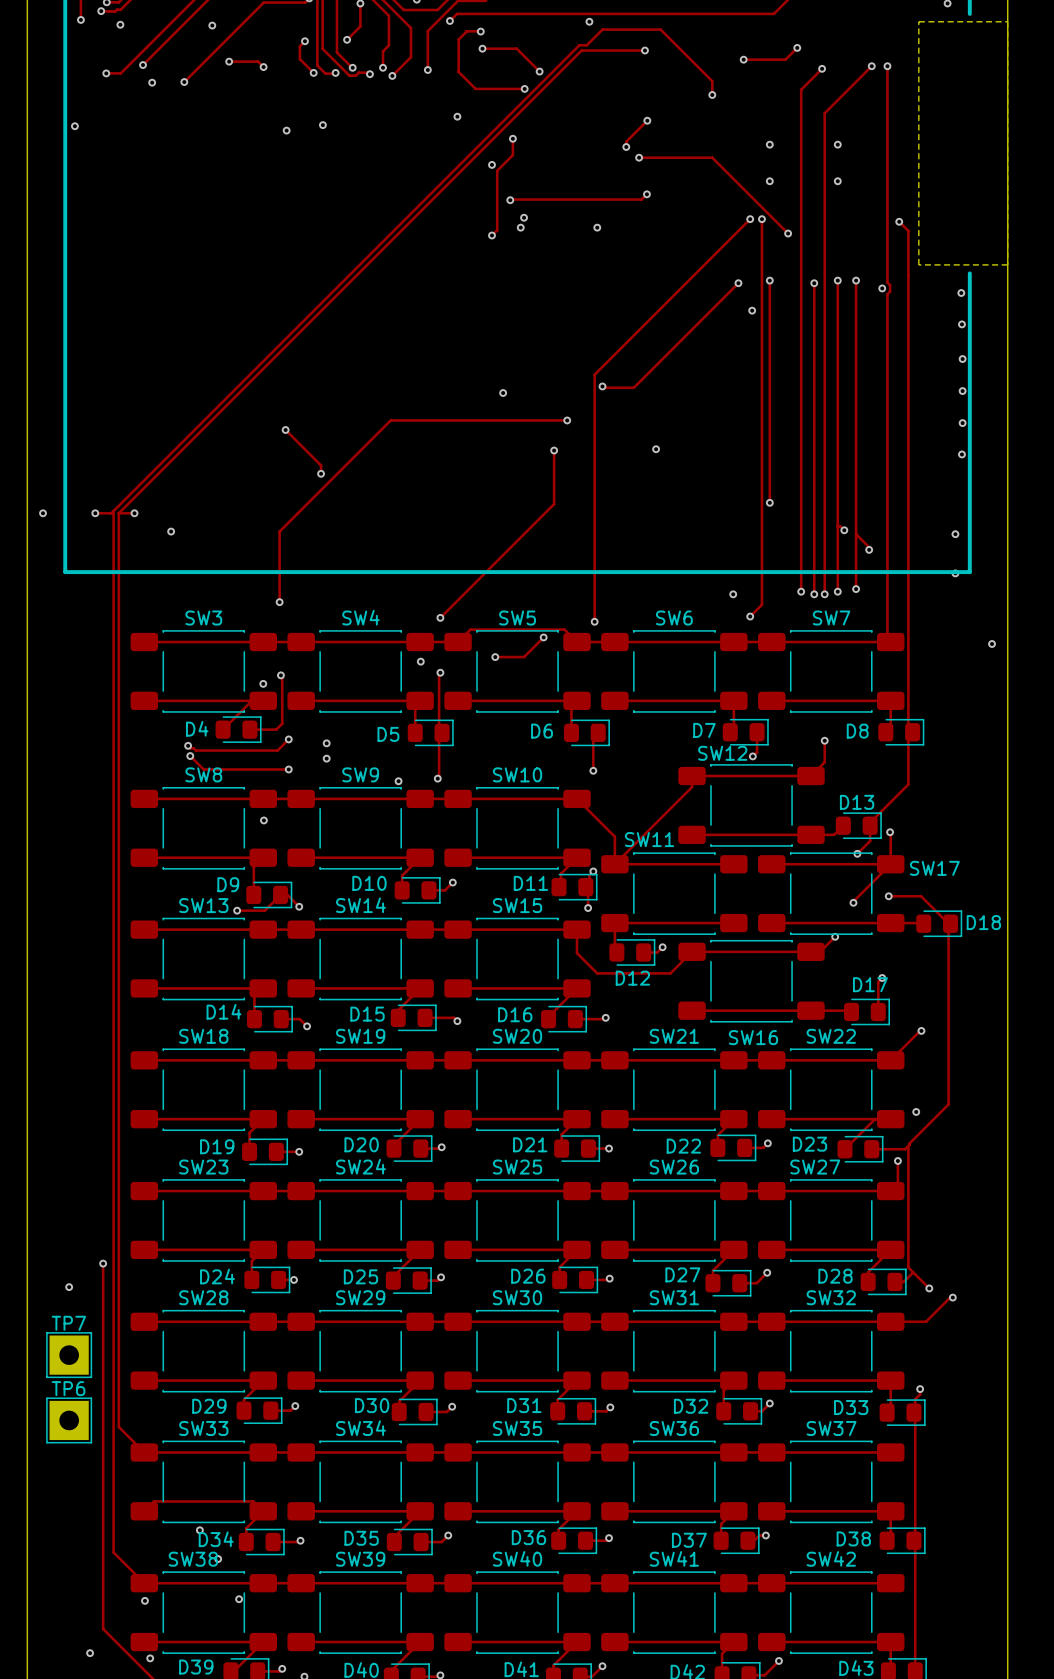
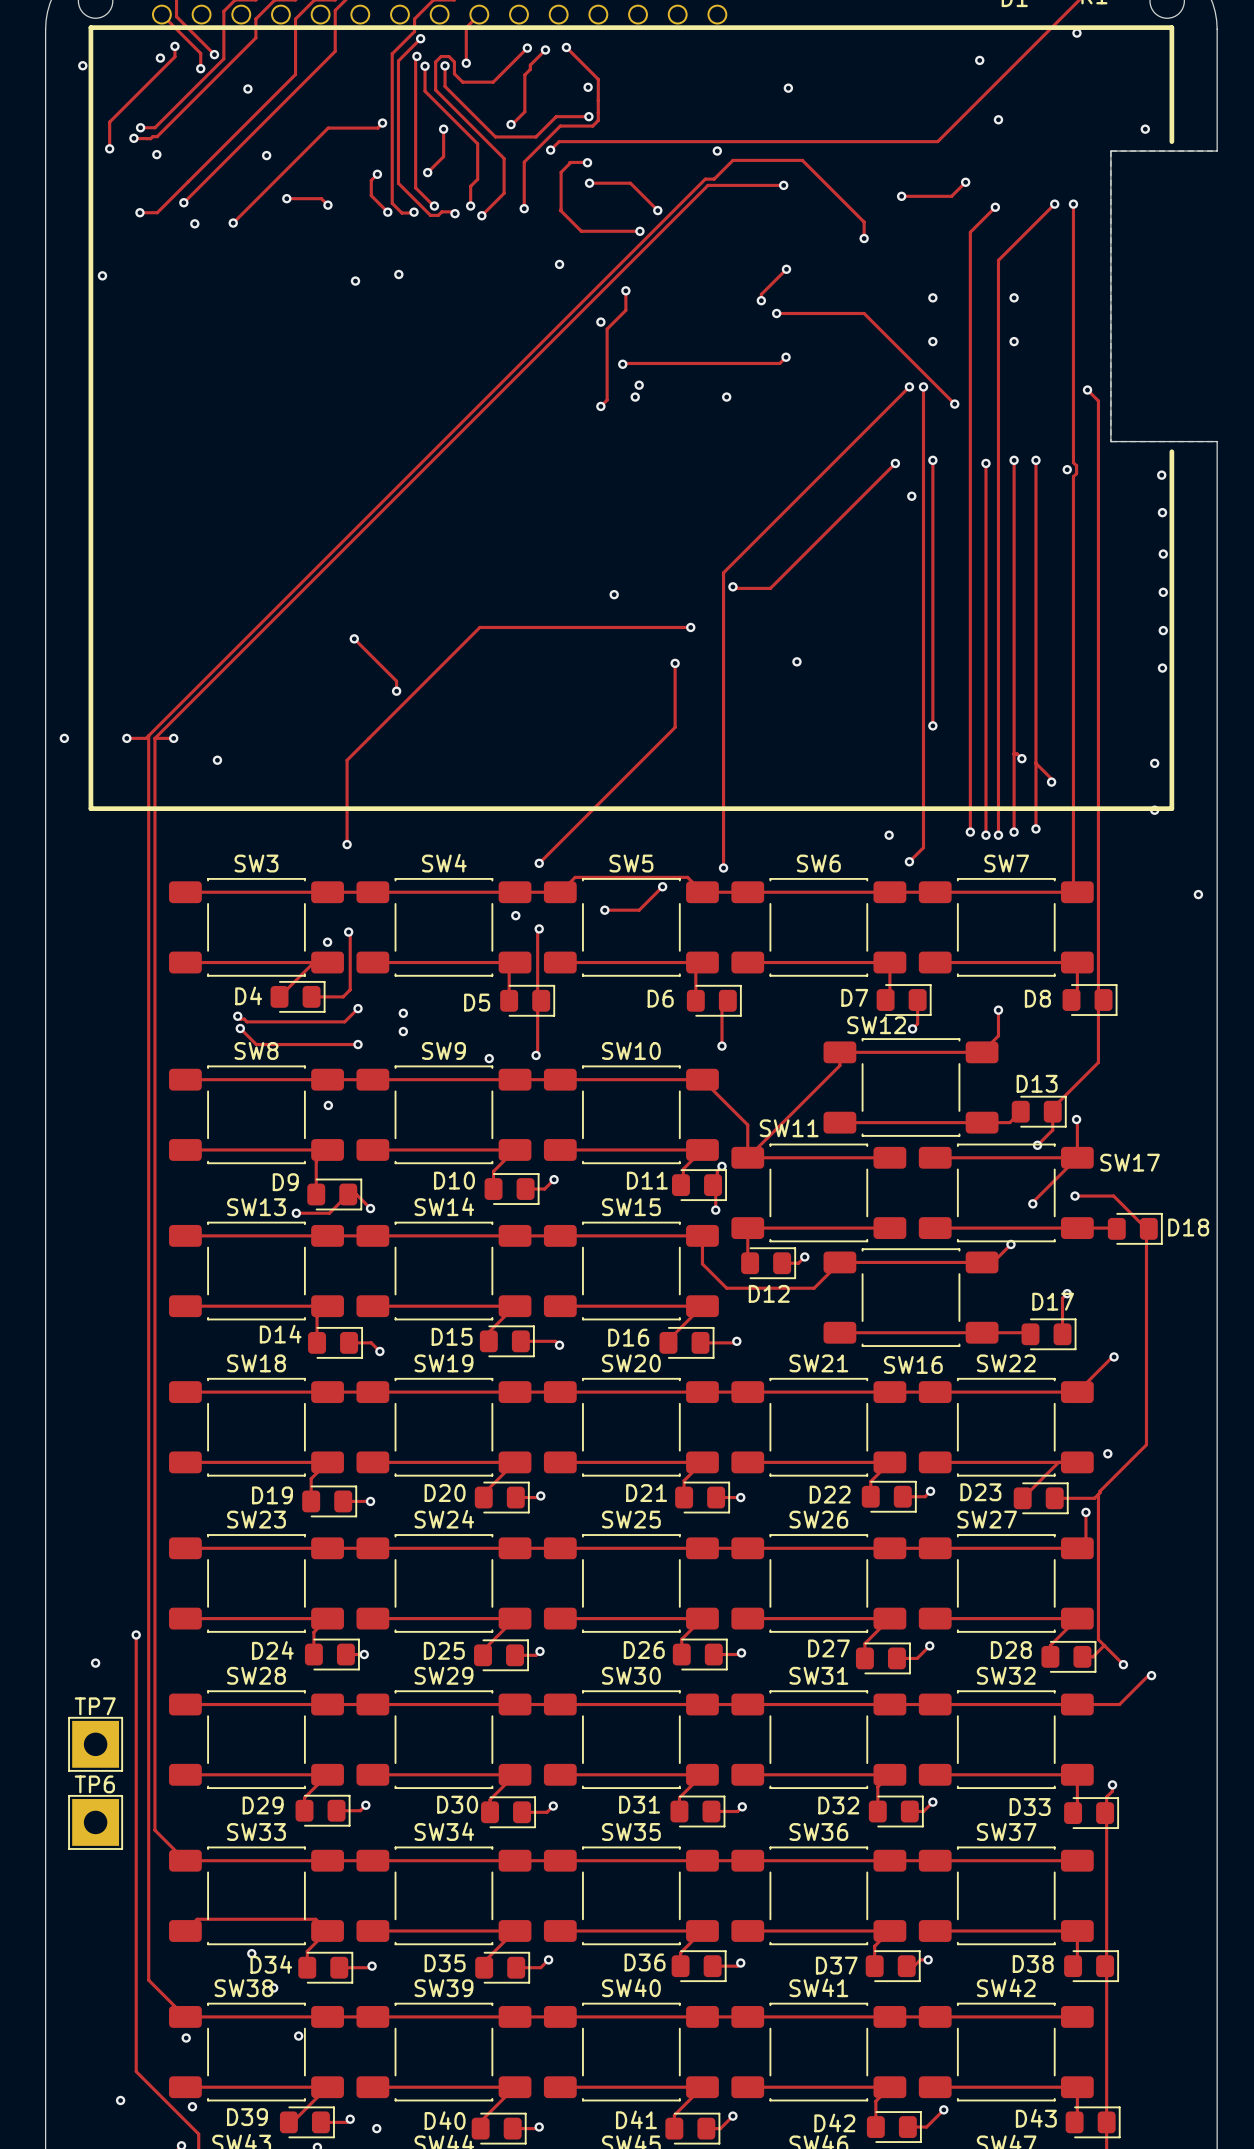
board edge: (1007, 21) (1007, 264) (1007, 21) -> (1217, 151) (1110, 151) (1110, 441) (1217, 441)

